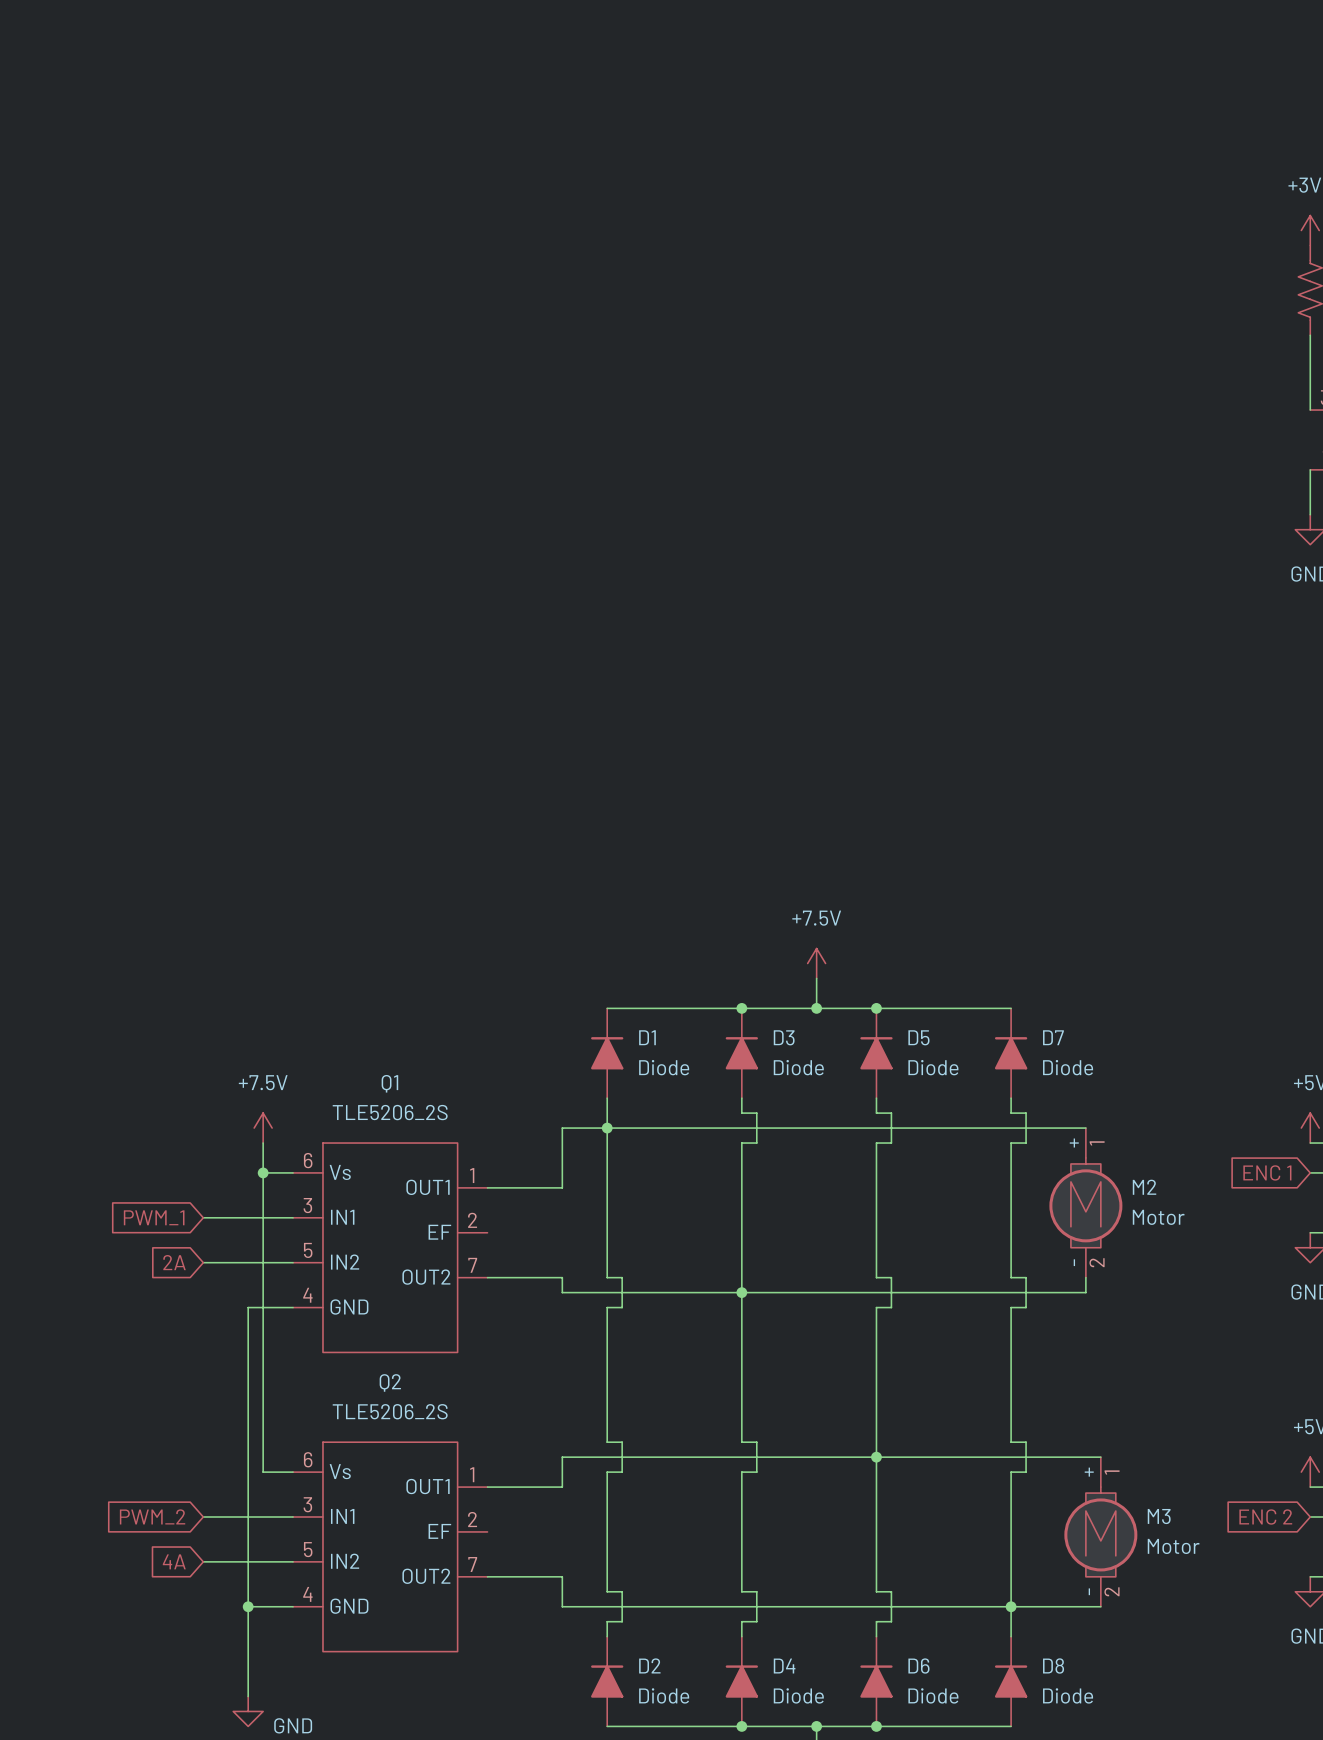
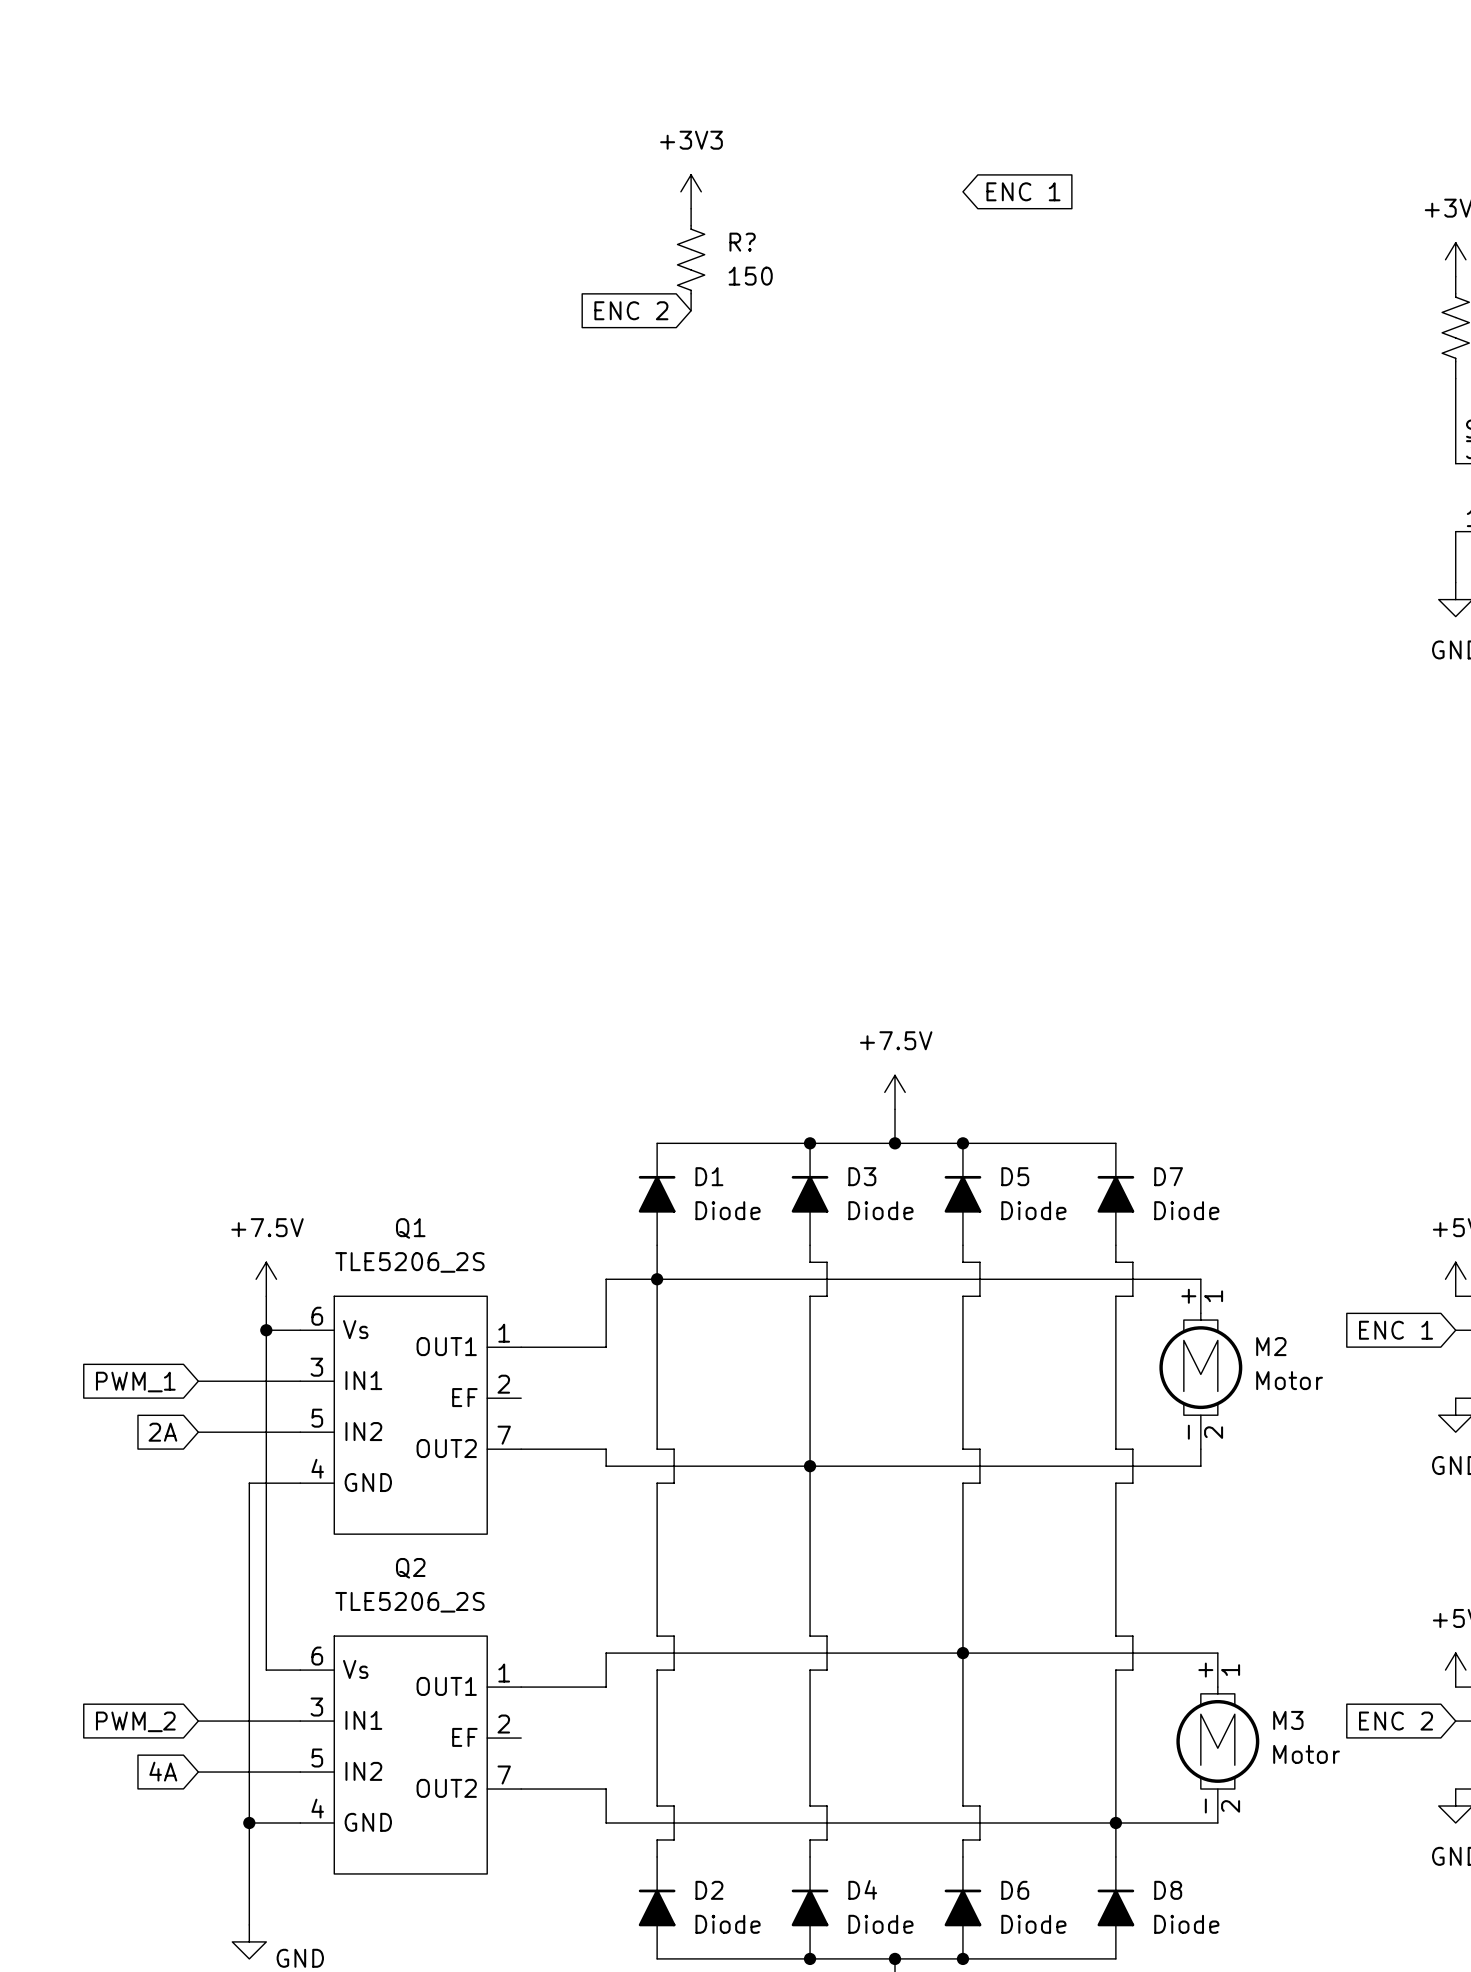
power symbol: none -> +3V3 (691, 191)
global label: none -> ENC 1 (1023, 191)
R?: none -> 150 (691, 259)
global label: none -> ENC 2 (631, 310)

